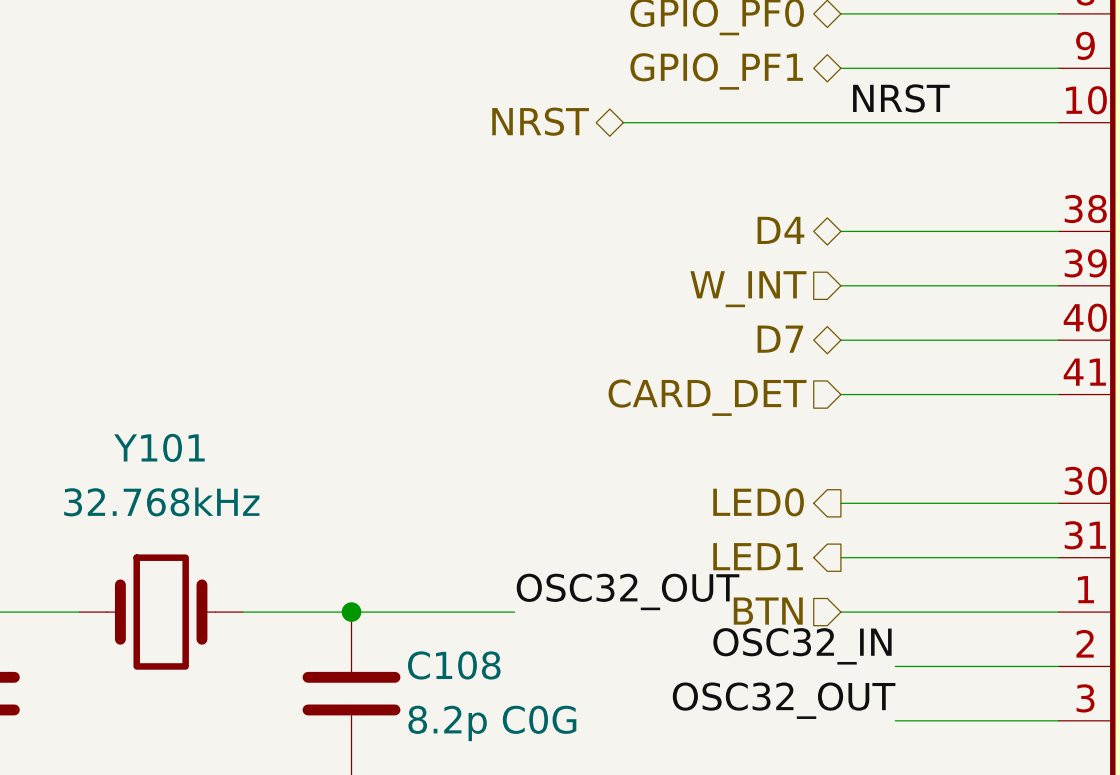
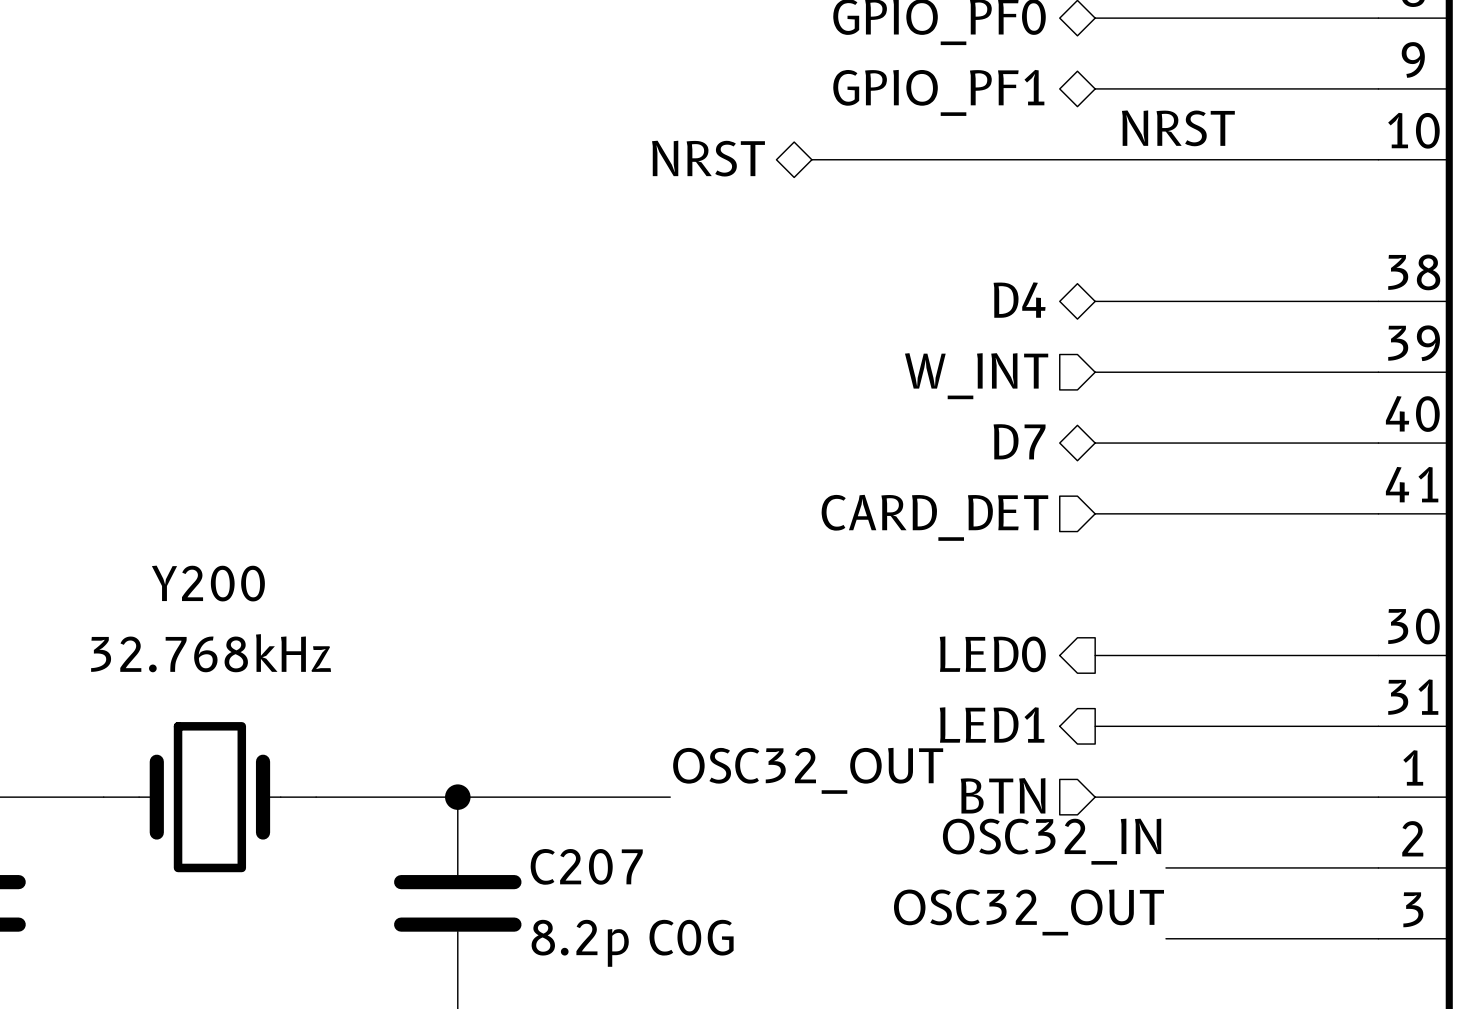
Y101 name: Y101 (159, 447) -> Y200 (208, 583)
C108 name: C108 (454, 665) -> C207 (586, 866)

